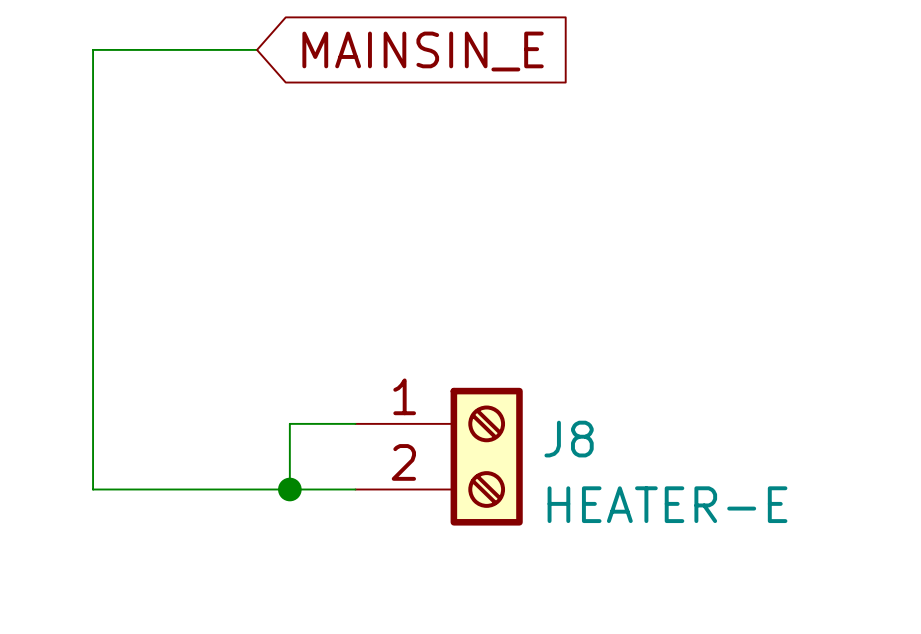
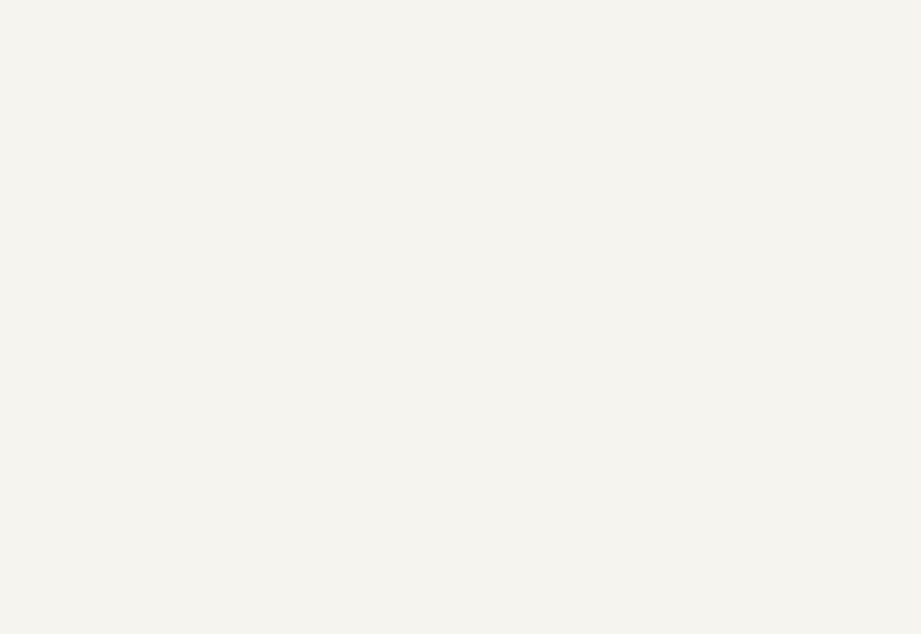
wire: (257, 49) (93, 49) (93, 489) (355, 489) -> none
global label: MAINSIN_E (423, 51) -> none
wire: (355, 423) (289, 423) (289, 489) -> none
J8: HEATER-E (439, 456) -> none
junction: (289, 489) -> none

